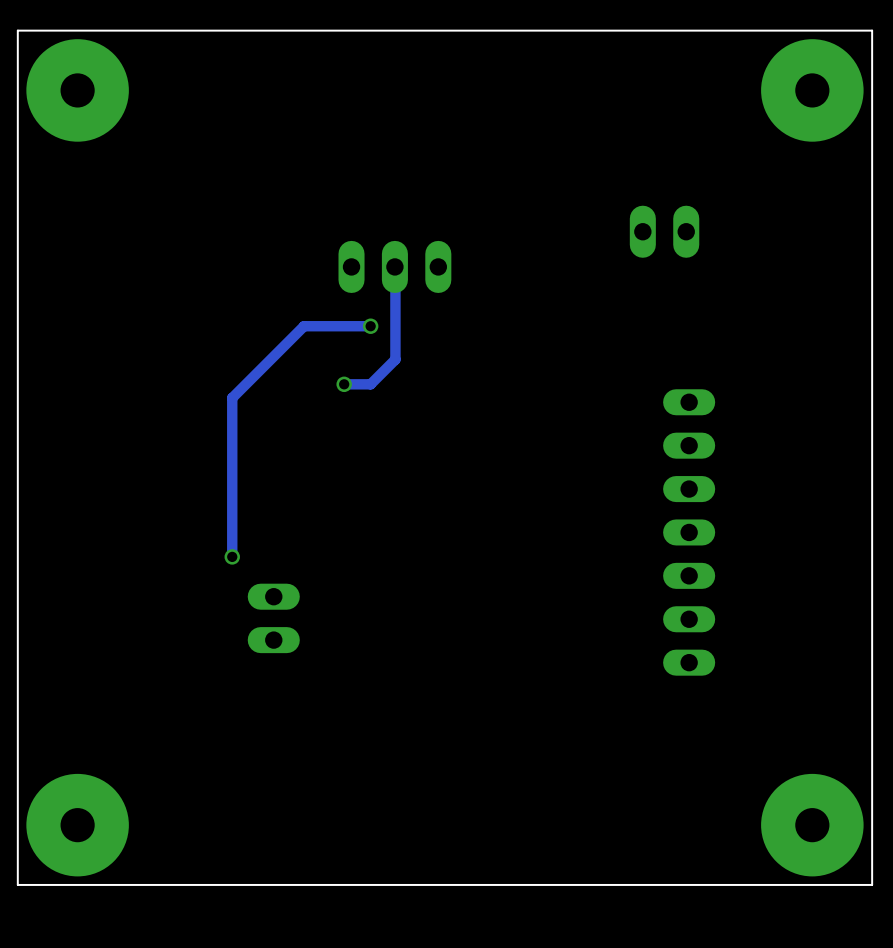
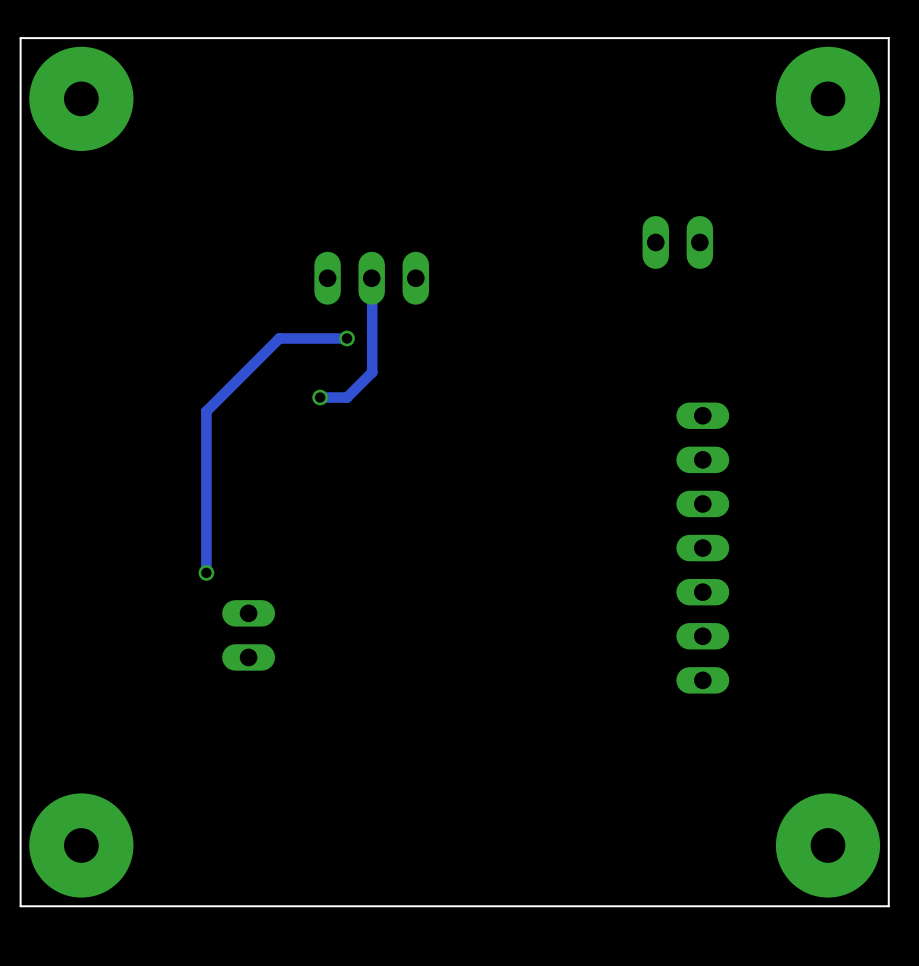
track: (394, 266) (395, 359) (370, 384) (344, 384) -> (371, 278) (372, 372) (347, 397) (320, 397)
part position: (394, 266) -> (371, 278)
track: (304, 326) (232, 397) (232, 556) -> (311, 338) (279, 338) (206, 411) (206, 572)
via: none -> (347, 338)
track: (370, 326) (339, 326) -> none
via: (370, 326) -> none
via: none -> (320, 397)
via: (344, 384) -> none
via position: (232, 556) -> (206, 572)
part position: (273, 618) -> (248, 635)

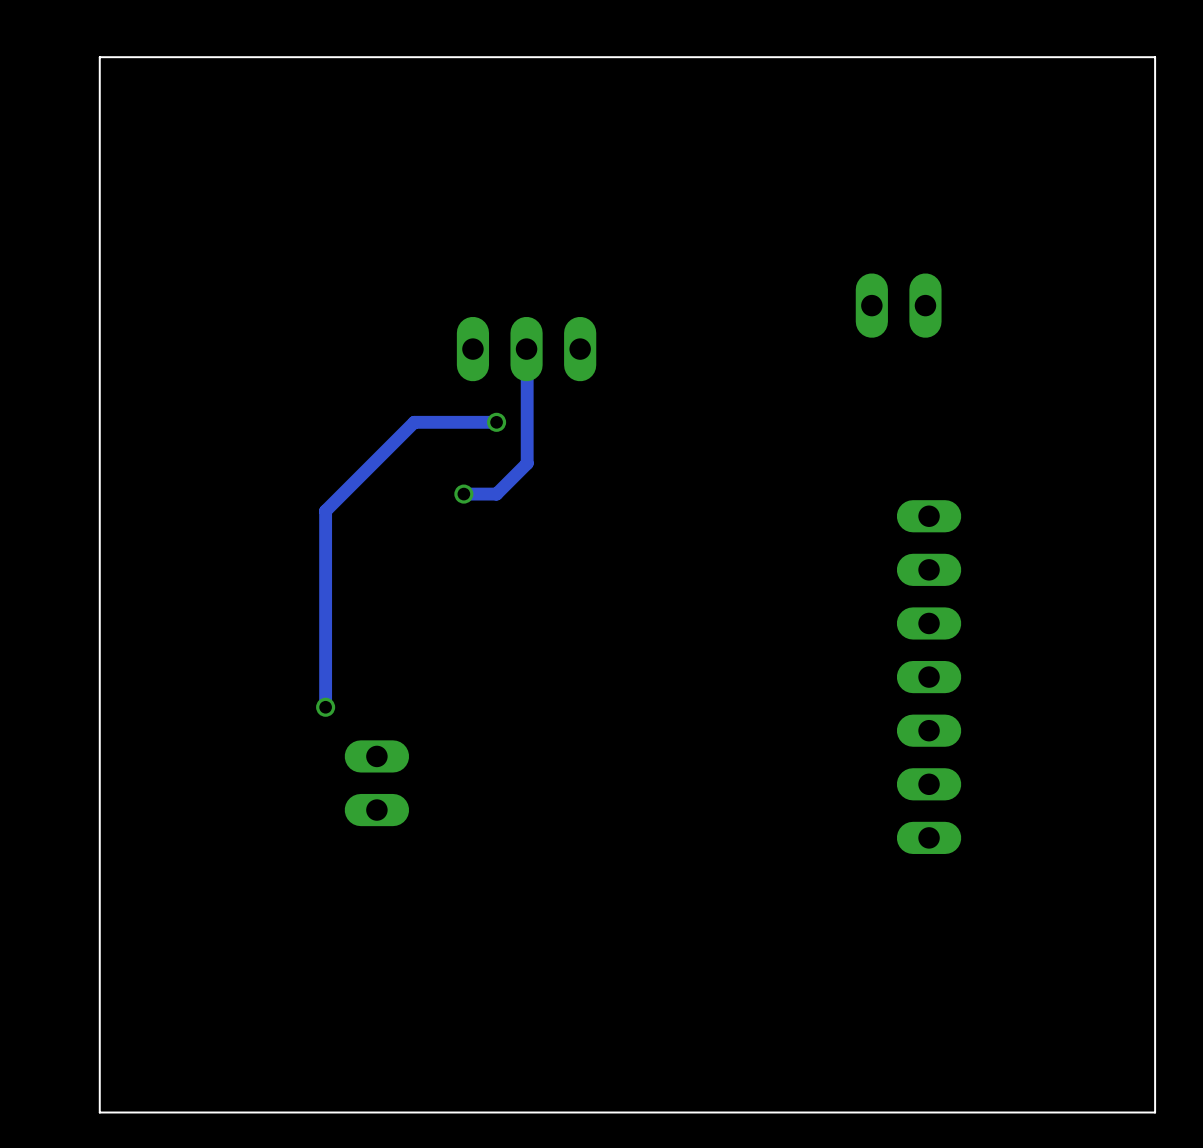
via: (81, 98) -> none
via: (827, 98) -> none
via: (81, 845) -> none
via: (827, 845) -> none

